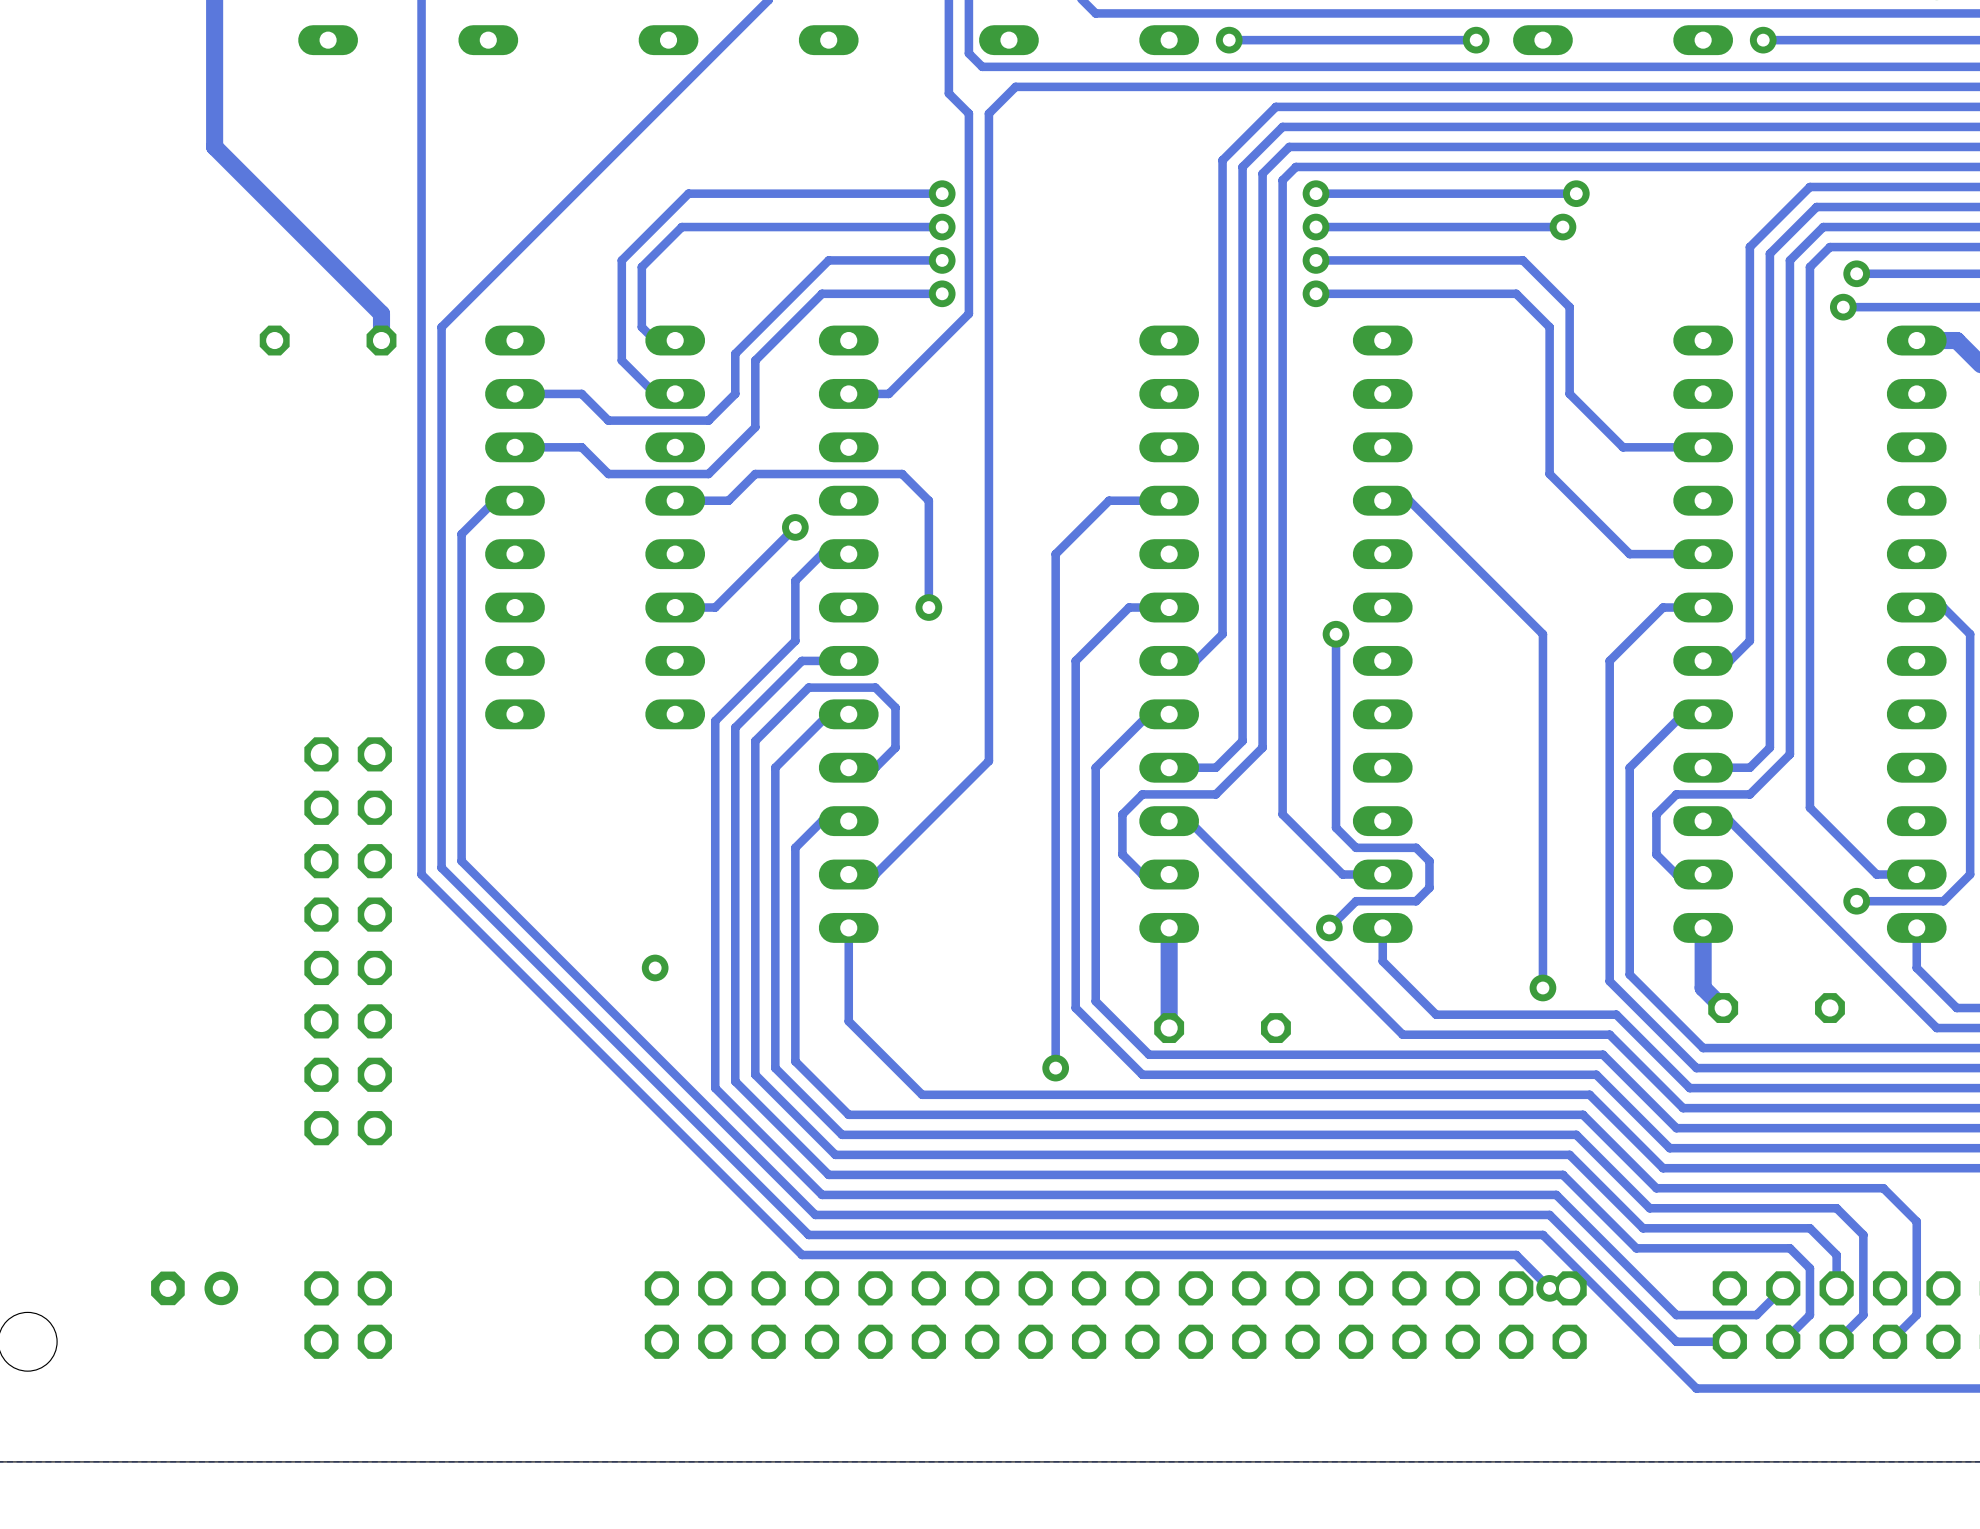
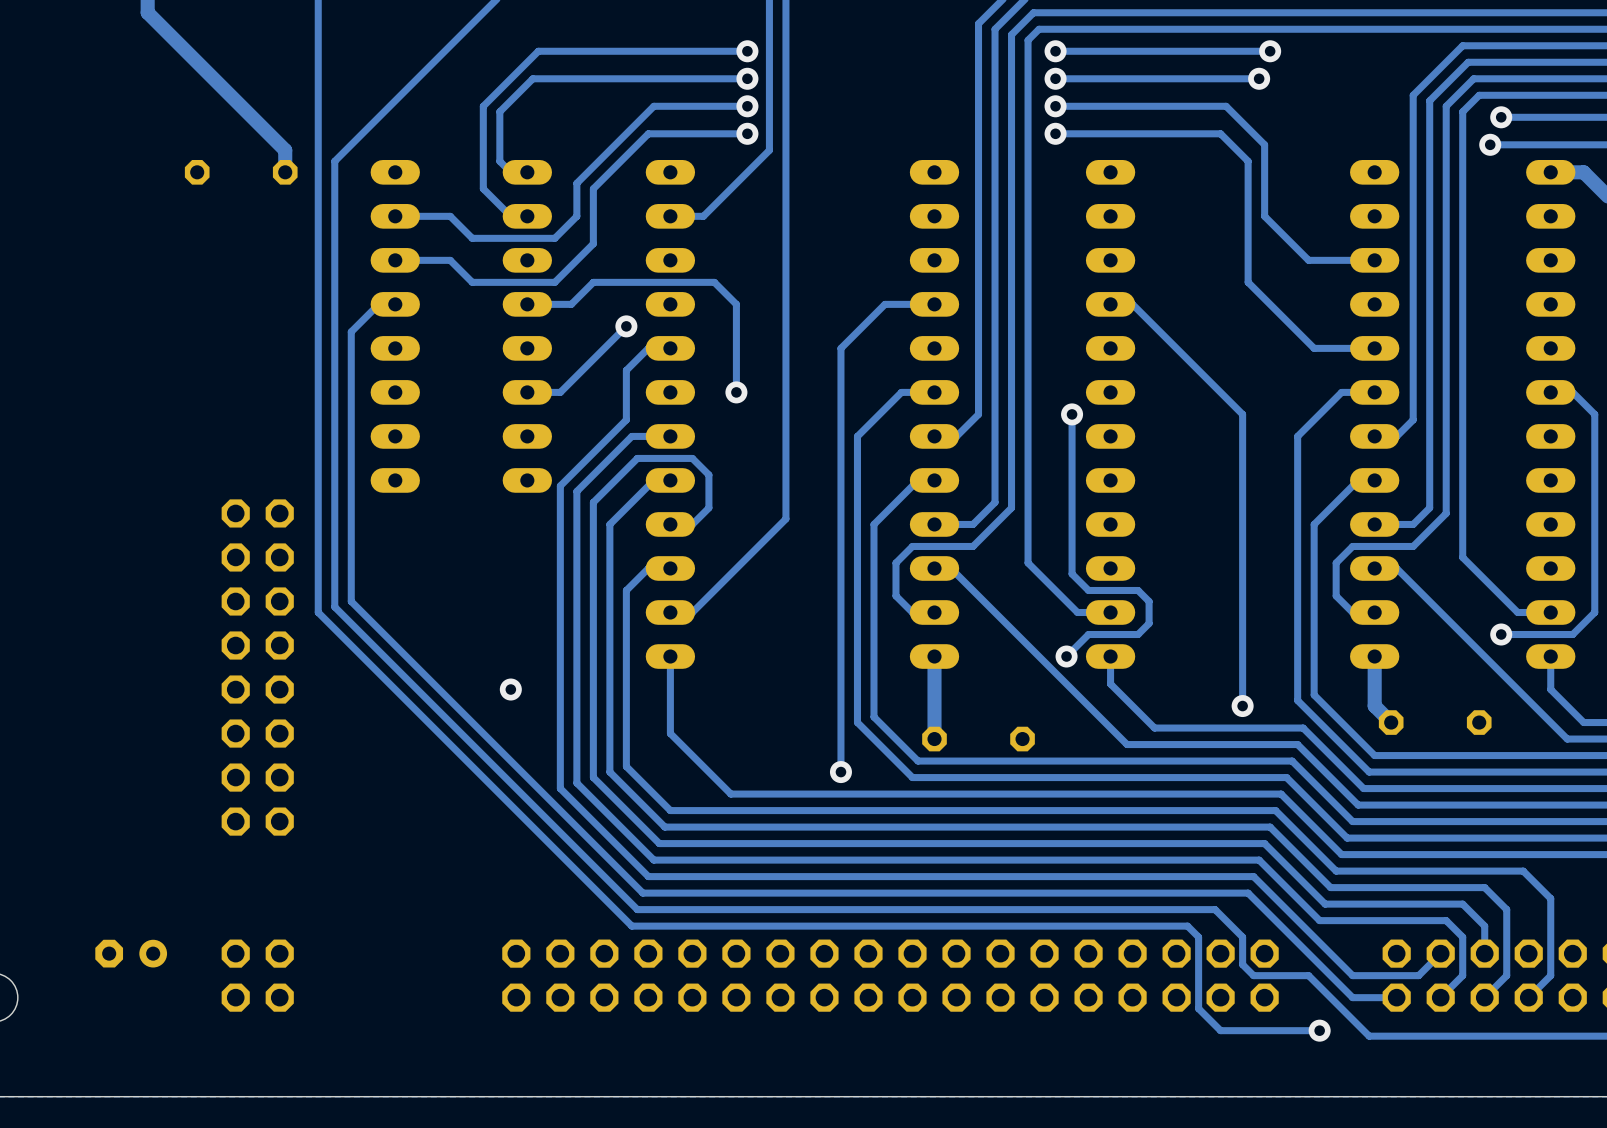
track: (1509, 1234) (1542, 1234) (1623, 1315) -> (1215, 909) (1242, 937) (1242, 964) (1253, 975) (1308, 975)
track: (1476, 1255) (1516, 1255) (1549, 1288) -> (1187, 926) (1198, 937) (1198, 1008) (1220, 1030) (1319, 1030)
via: (1549, 1288) -> none
via: none -> (1319, 1030)

